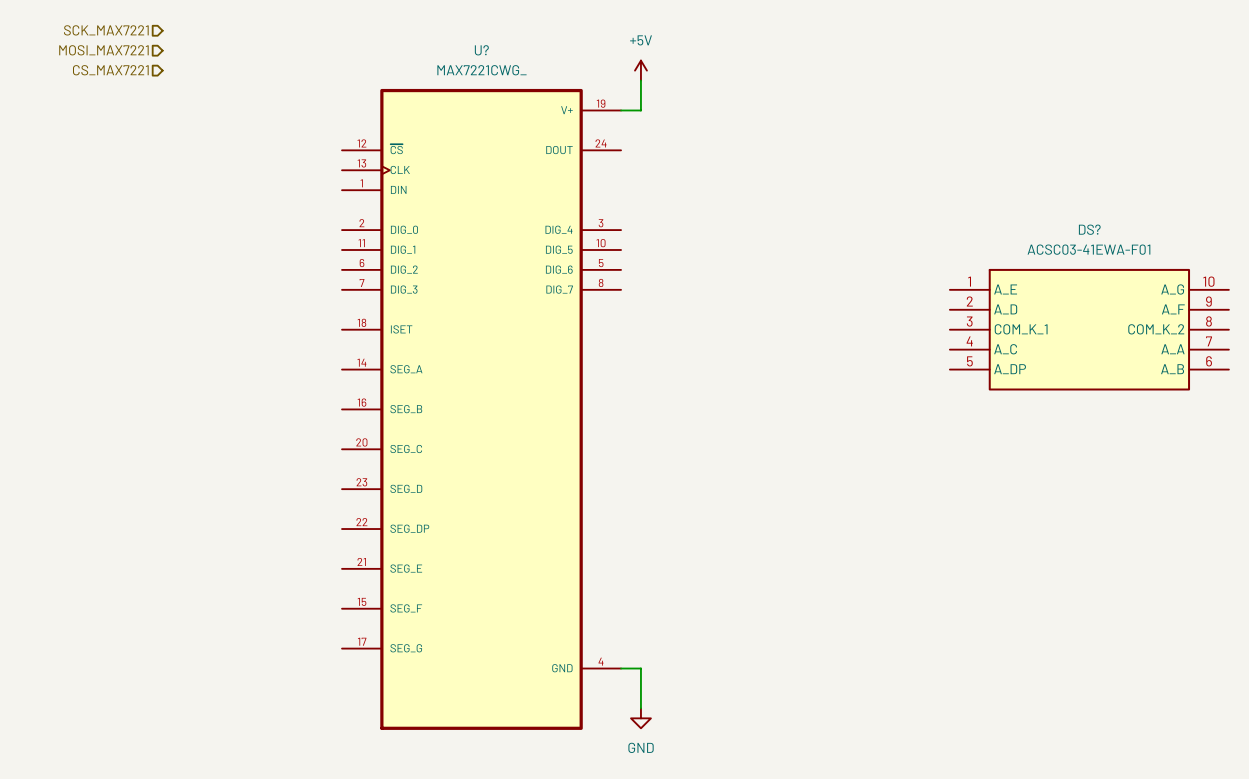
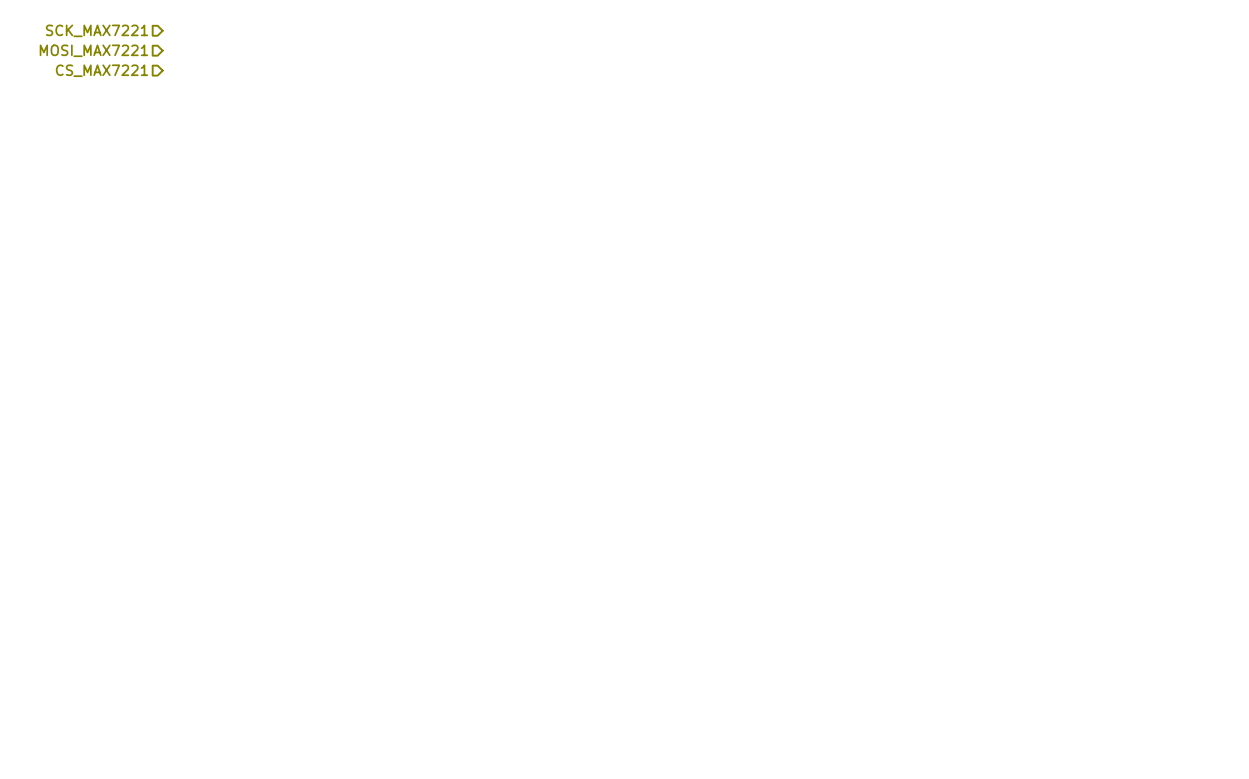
power symbol: +5V (640, 70) -> none
wire: (640, 80) (640, 110) (621, 110) -> none
DS?: ACSC03-41EWA-F01 (1089, 329) -> none
U?: MAX7221CWG_ (481, 409) -> none
wire: (621, 668) (640, 668) (640, 708) -> none
power symbol: GND (640, 718) -> none

